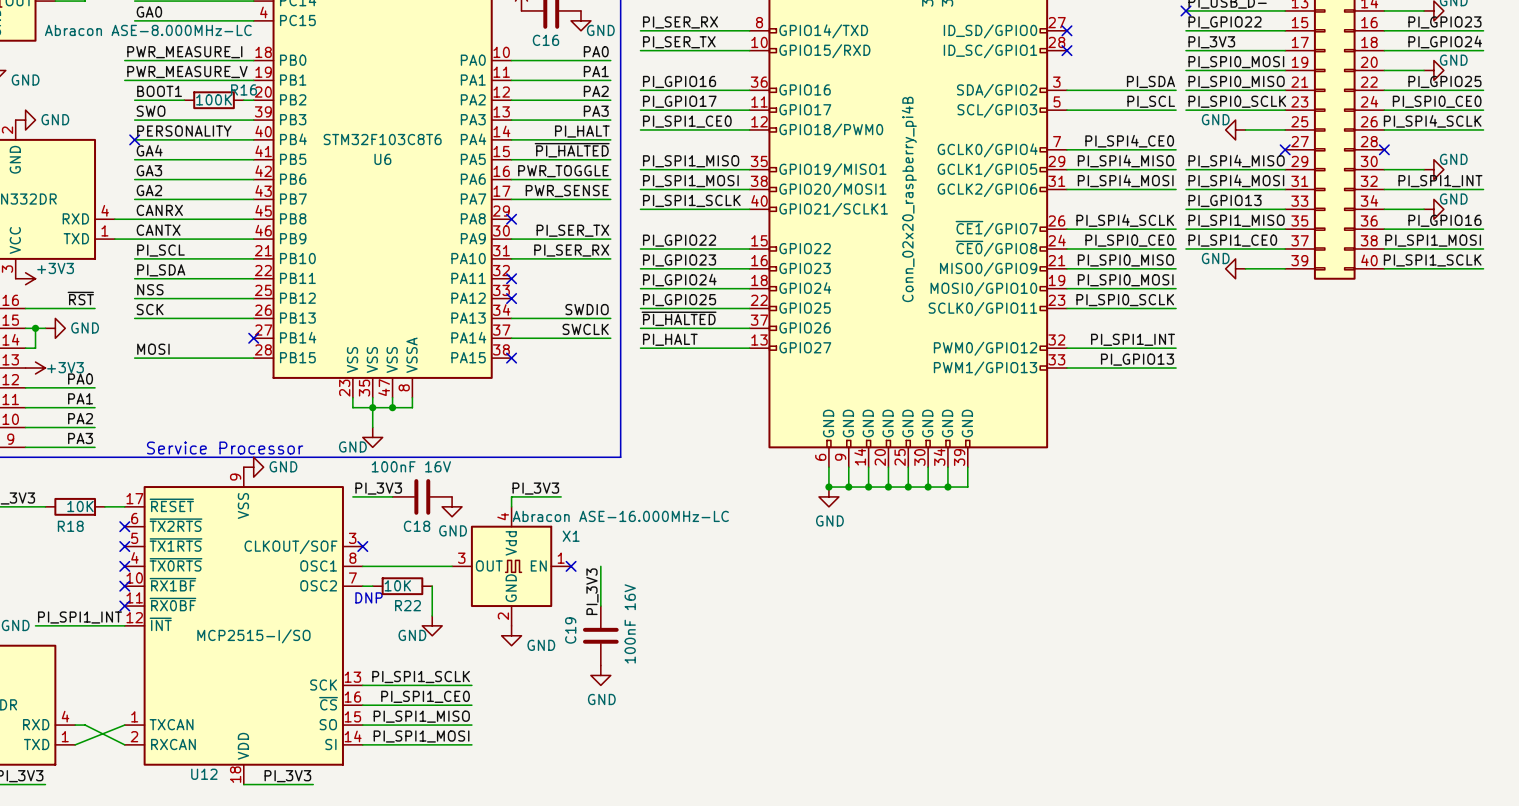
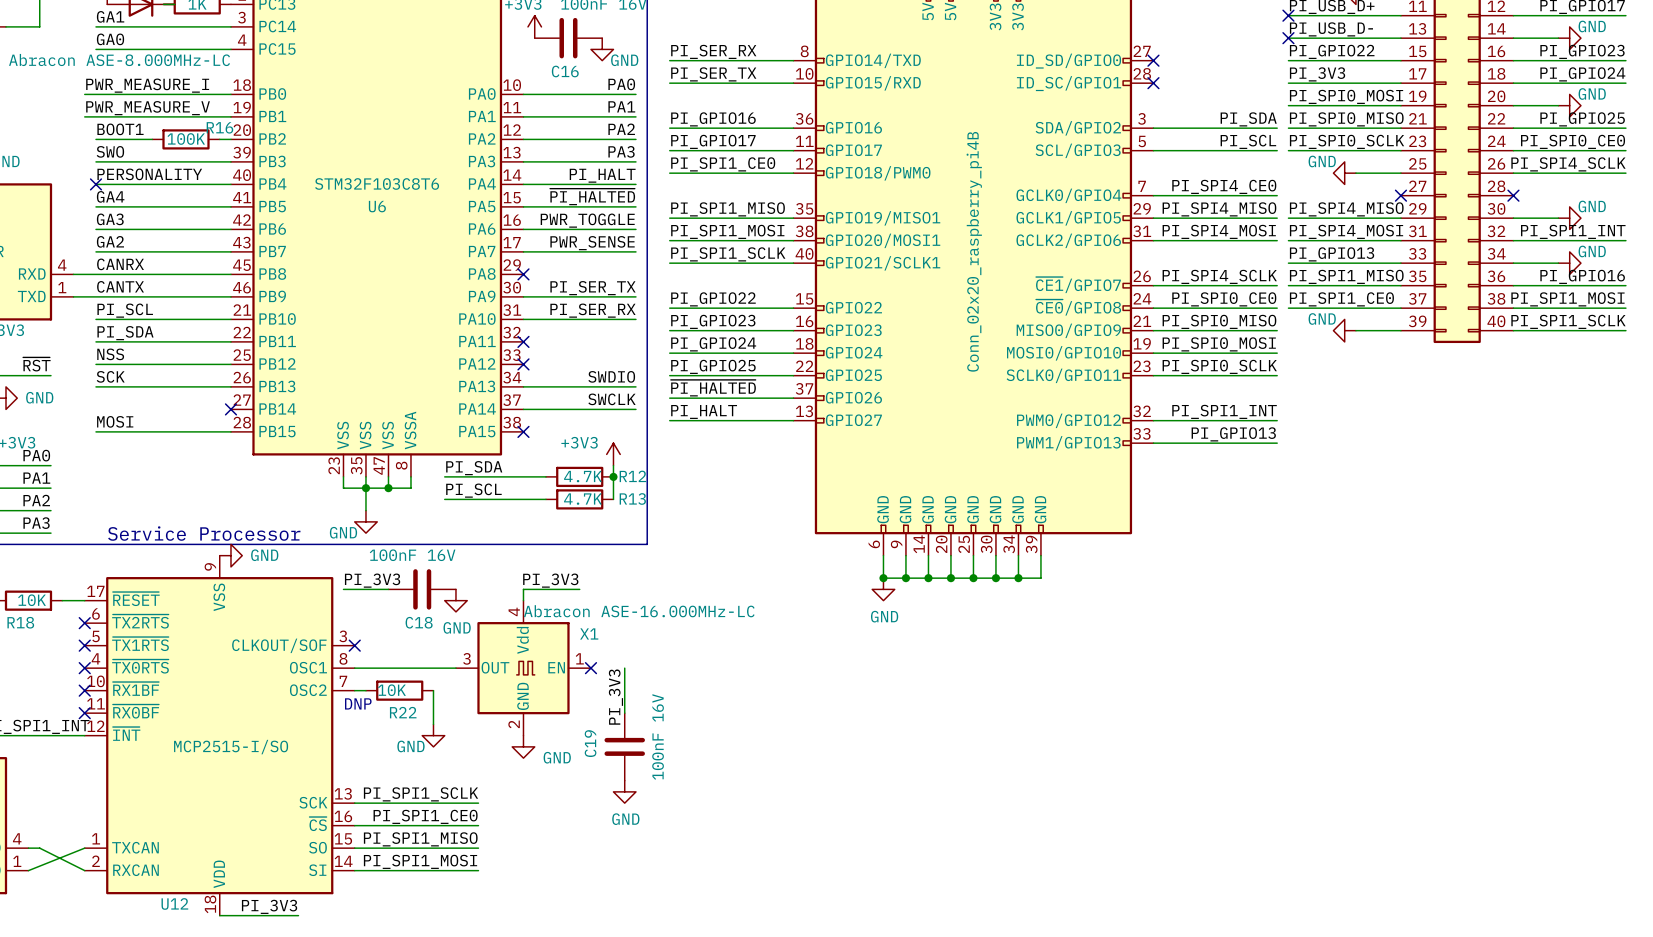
power symbol: none -> +3V3 (613, 454)
wire: none -> (613, 465) (613, 499)
label: none -> PI_SDA (474, 468)
wire: none -> (444, 476) (545, 476)
R12: none -> 4.7K (579, 476)
junction: none -> (613, 476)
label: none -> PI_SCL (473, 490)
wire: none -> (444, 499) (545, 499)
R13: none -> 4.7K (579, 499)

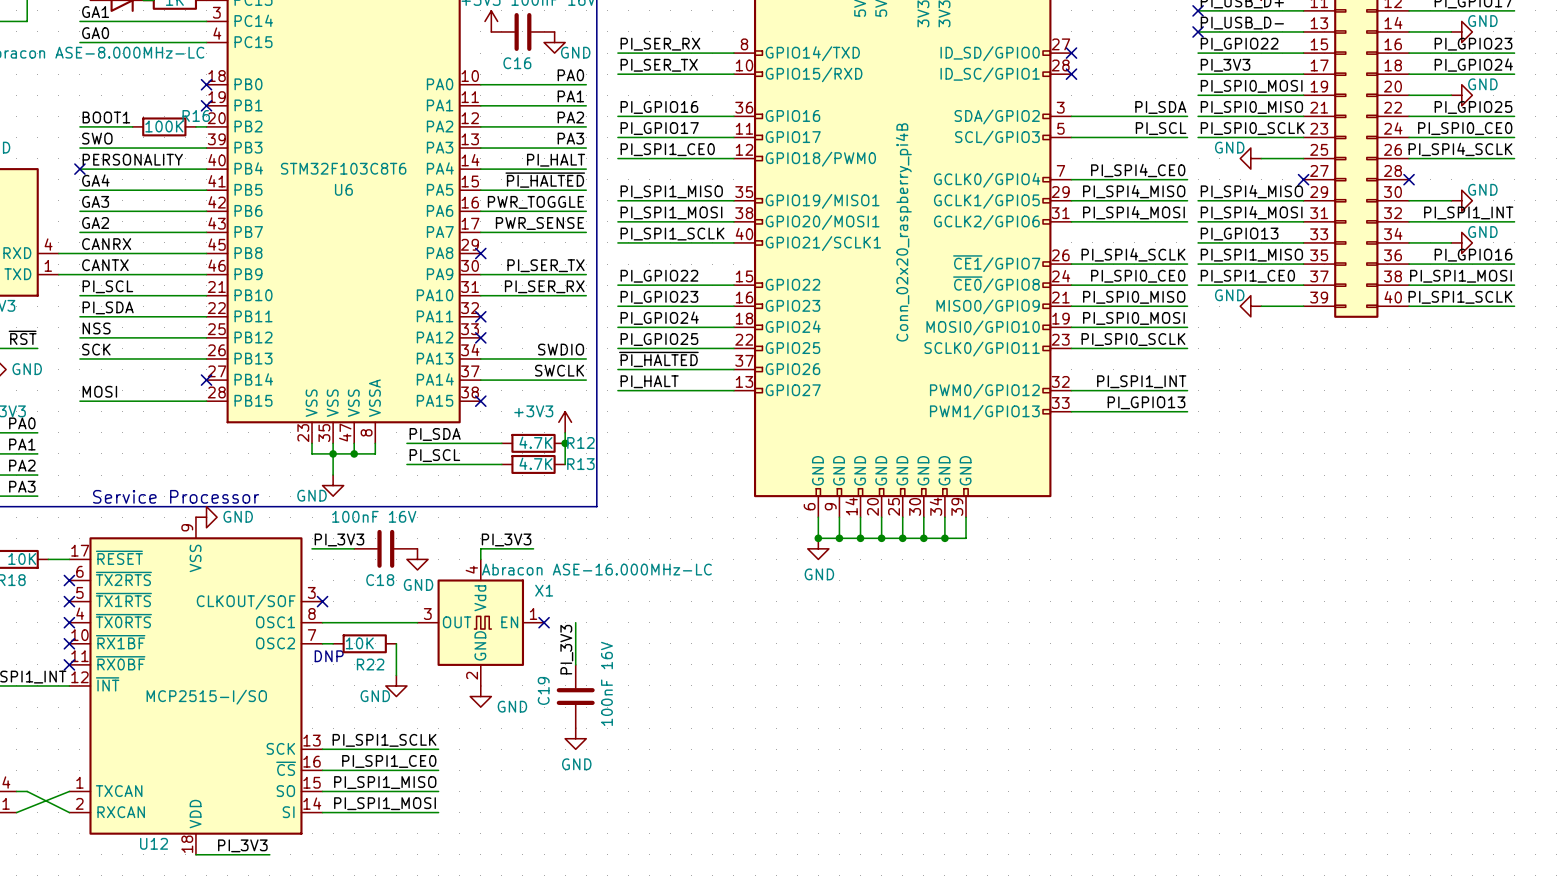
label: PWR_MEASURE_I (147, 85) -> none
wire: (84, 94) (230, 94) -> none
no-connect mark: none -> (206, 84)
label: PWR_MEASURE_V (148, 108) -> none
wire: (84, 116) (230, 116) -> none
no-connect mark: none -> (206, 105)

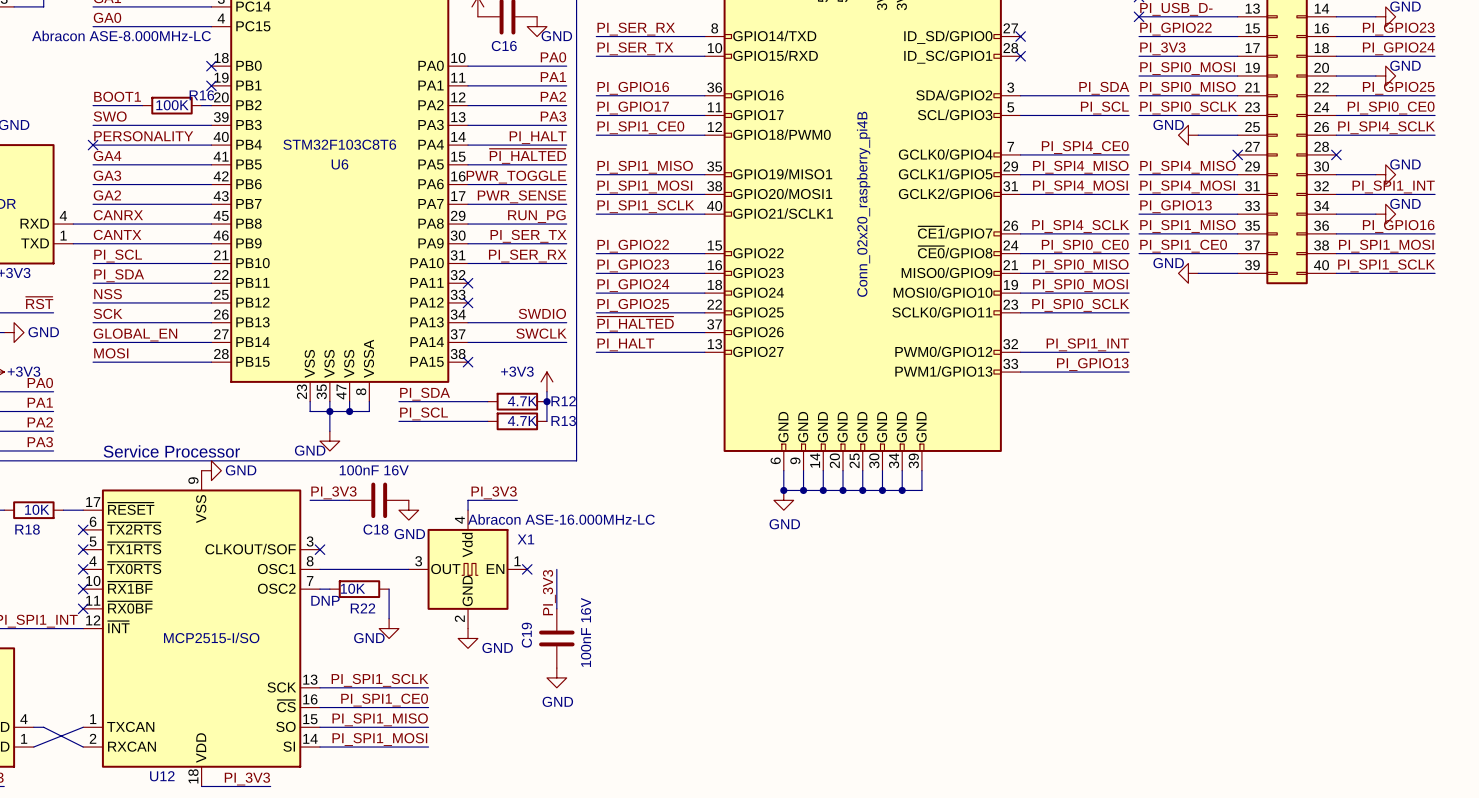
label: none -> RUN_PG (536, 216)
wire: none -> (468, 224) (566, 224)
no-connect mark: (480, 253) -> none
label: none -> GLOBAL_EN (135, 334)
wire: none -> (93, 342) (211, 342)
no-connect mark: (206, 380) -> none

